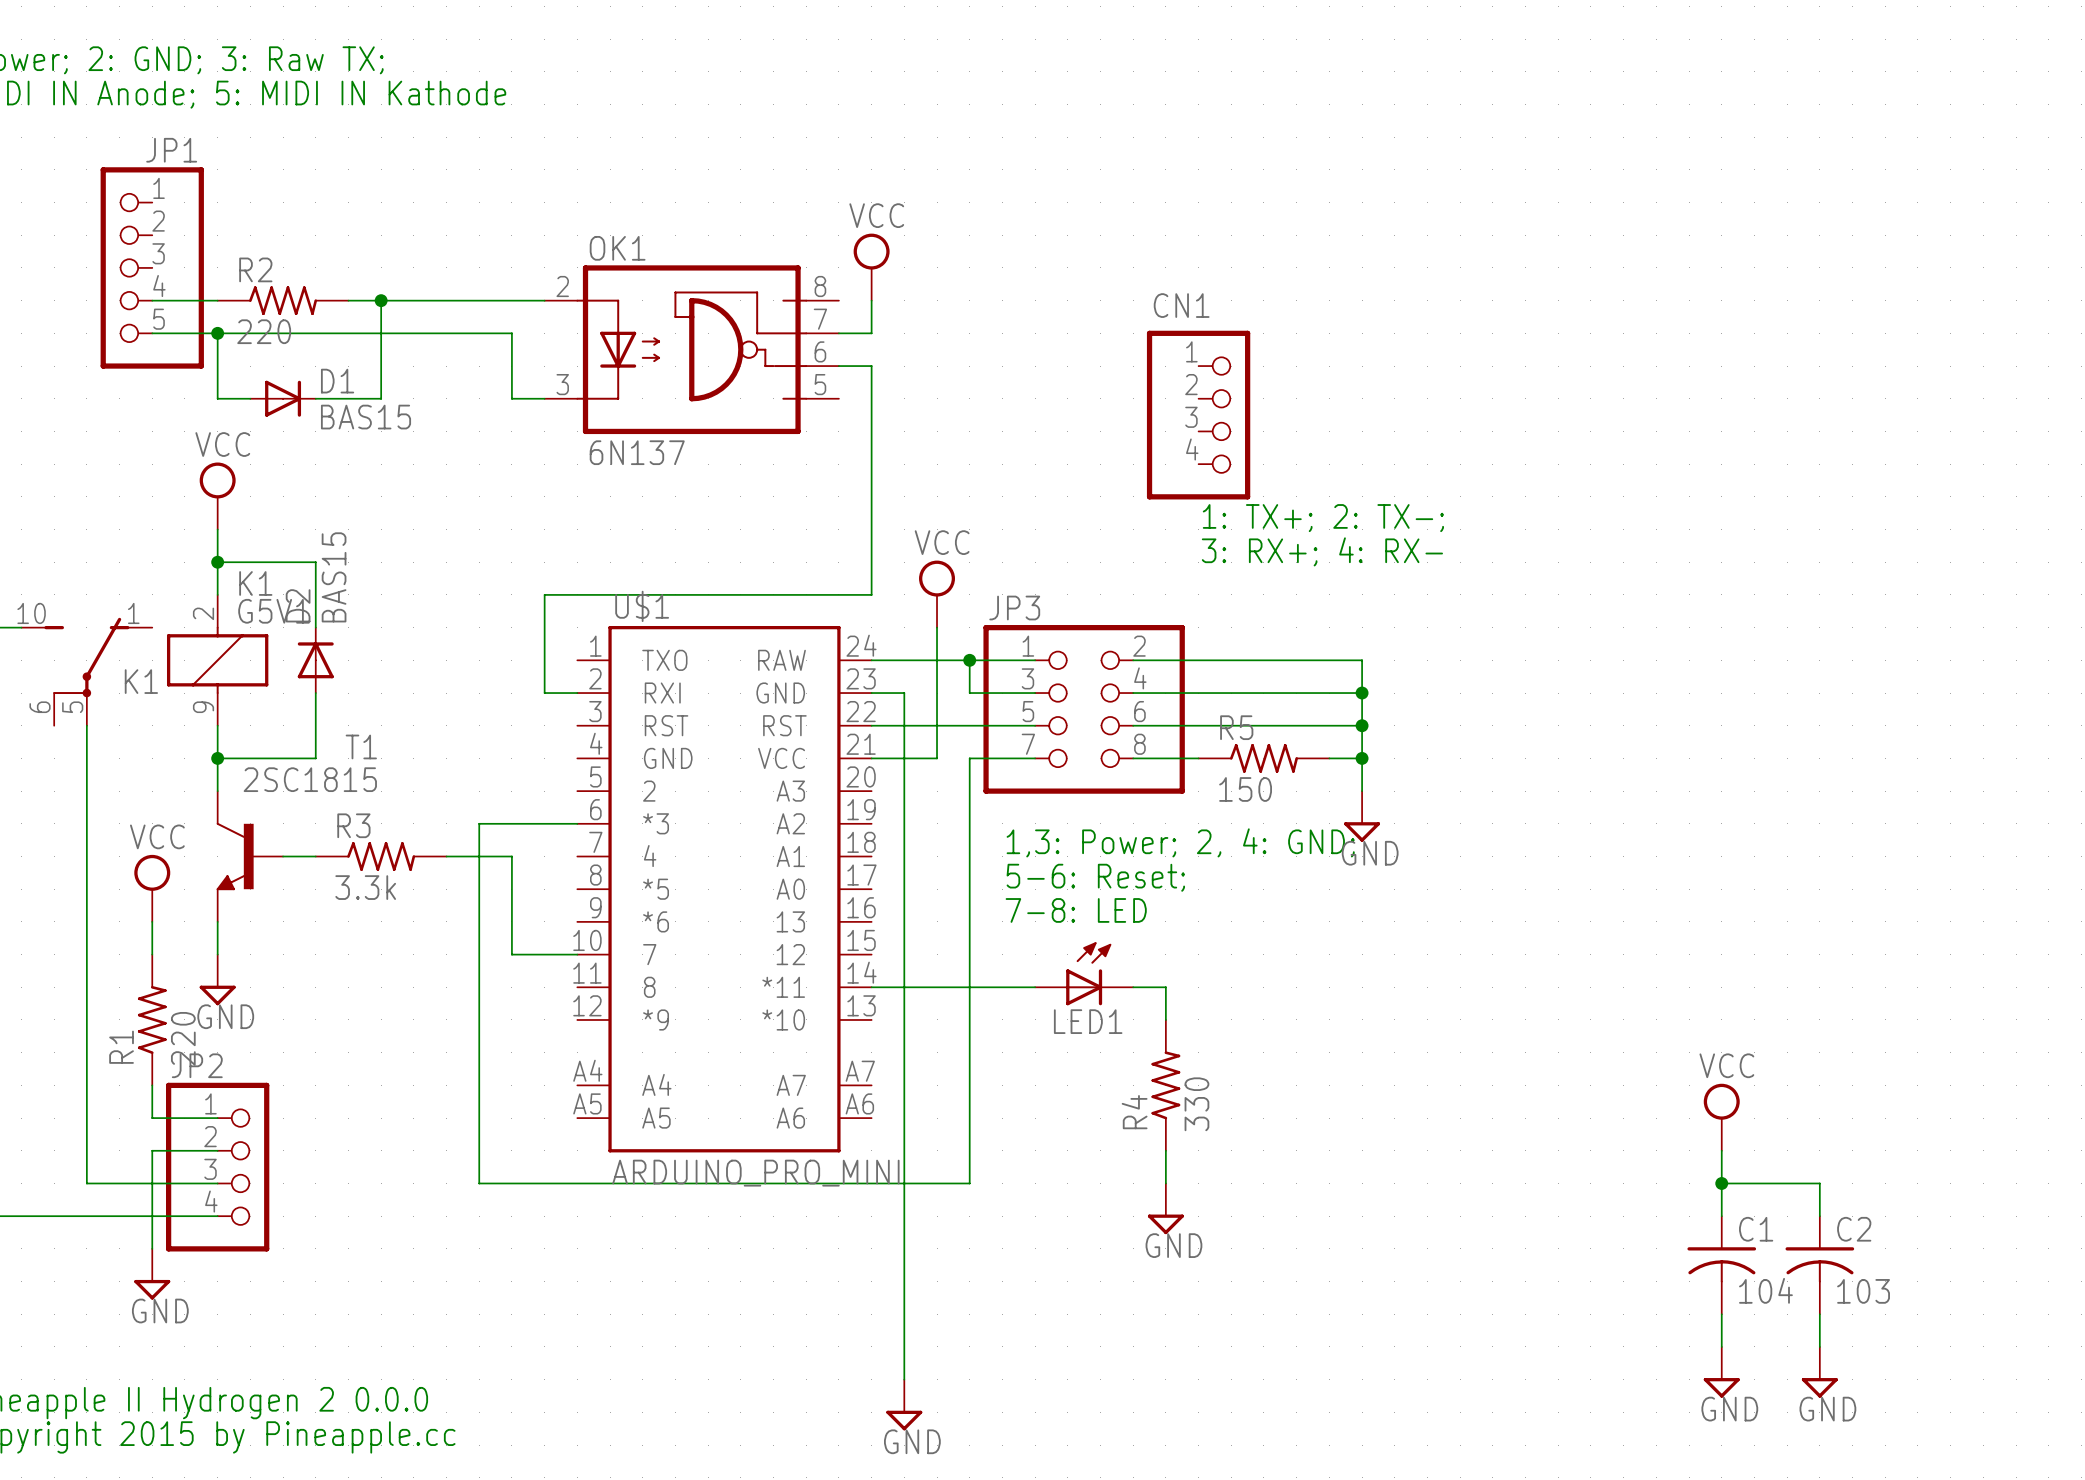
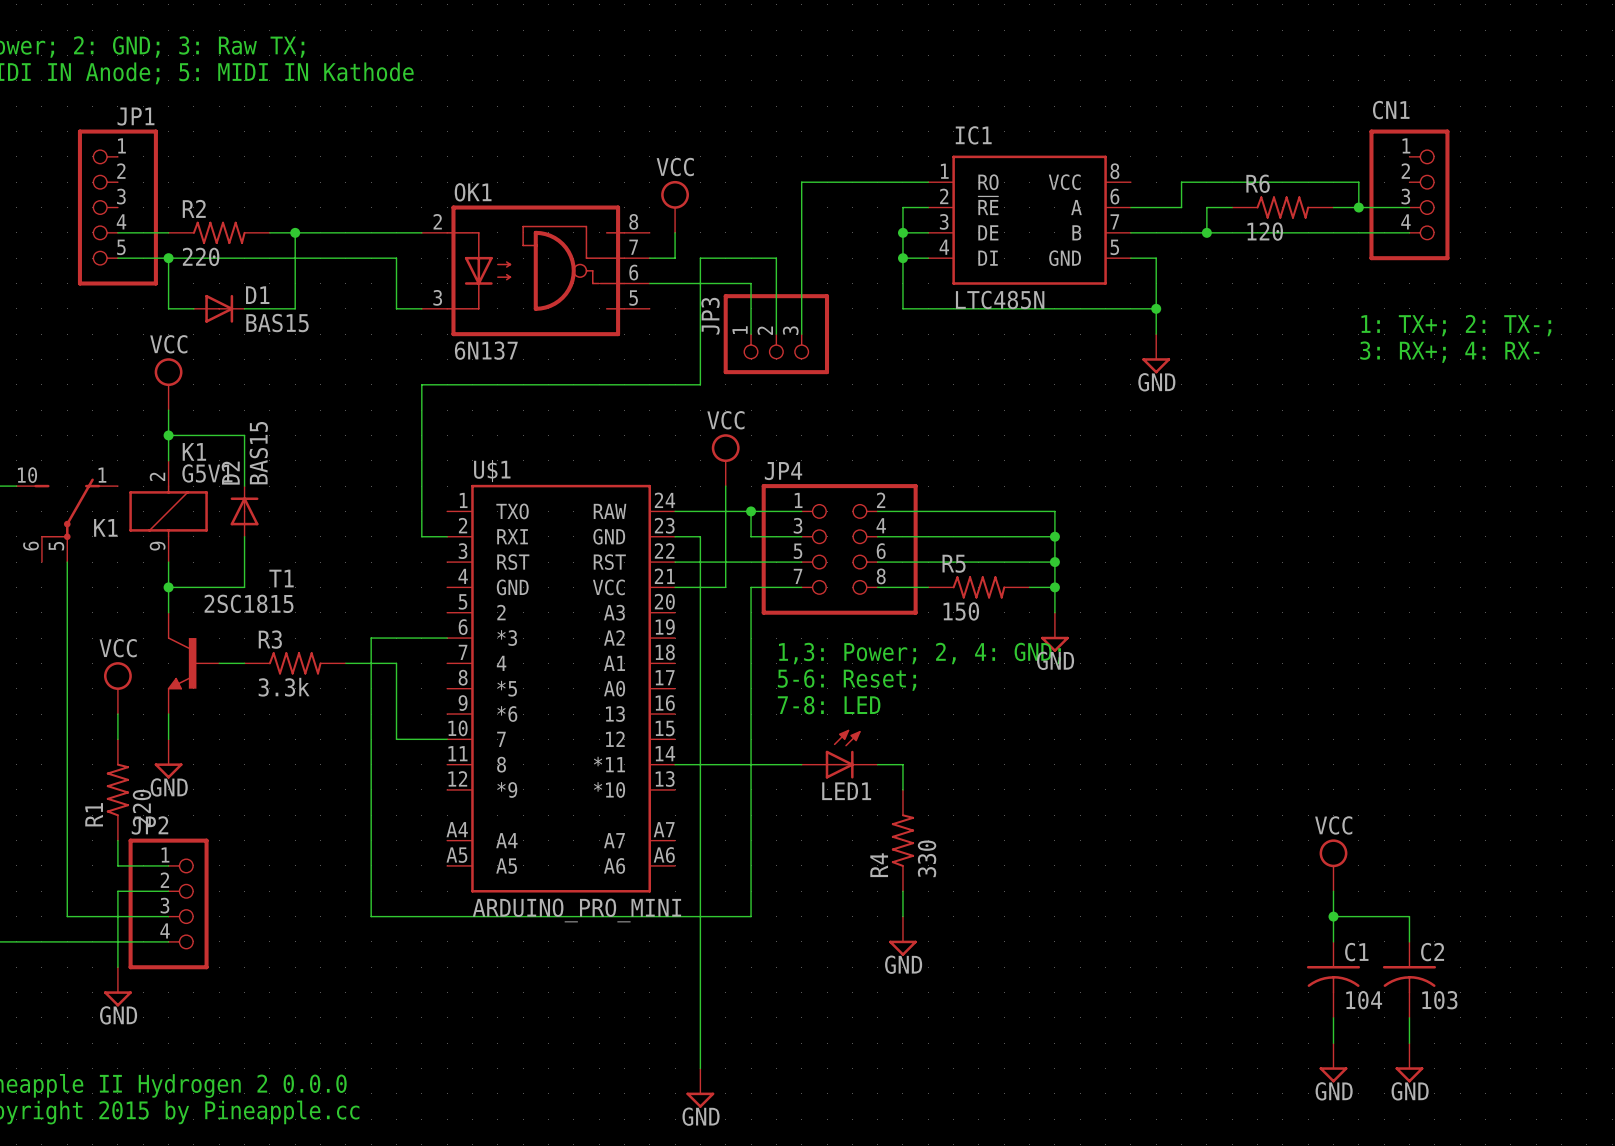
wire: none -> (928, 182) (801, 182) (801, 334)
wire: none -> (928, 207) (902, 207) (902, 308) (1156, 308)
wire: none -> (1130, 207) (1181, 207) (1181, 182) (1358, 182) (1358, 207)
wire: none -> (1232, 207) (1206, 207) (1206, 232)
R6: none -> 120 (1282, 207)
wire: none -> (1333, 207) (1409, 207)
junction: none -> (1358, 207)
IC1: none -> LTC485N (1029, 220)
wire: none -> (902, 232) (928, 232)
junction: none -> (902, 232)
wire: none -> (1130, 232) (1409, 232)
junction: none -> (1206, 232)
junction: none -> (902, 258)
wire: none -> (1130, 258) (1156, 258) (1156, 334)
wire: (871, 366) (871, 594) (544, 594) -> (776, 334) (776, 258) (700, 258) (700, 384) (421, 384) (421, 460)
wire: none -> (675, 283) (751, 283) (751, 334)
junction: none -> (1156, 308)
CN1 position: (1198, 415) -> (1409, 194)
text: none -> 1: TX+; 2: TX-; (1456, 325)
JP3: none -> (776, 334)
text: none -> 3: RX+; 4: RX- (1449, 352)
power symbol: none -> GND (1156, 353)
text: 1: TX+; 2: TX-; (1323, 518) -> none
text: 3: RX+; 4: RX- (1322, 551) -> none
JP3 name: JP3 (1014, 608) -> JP4 (783, 471)

